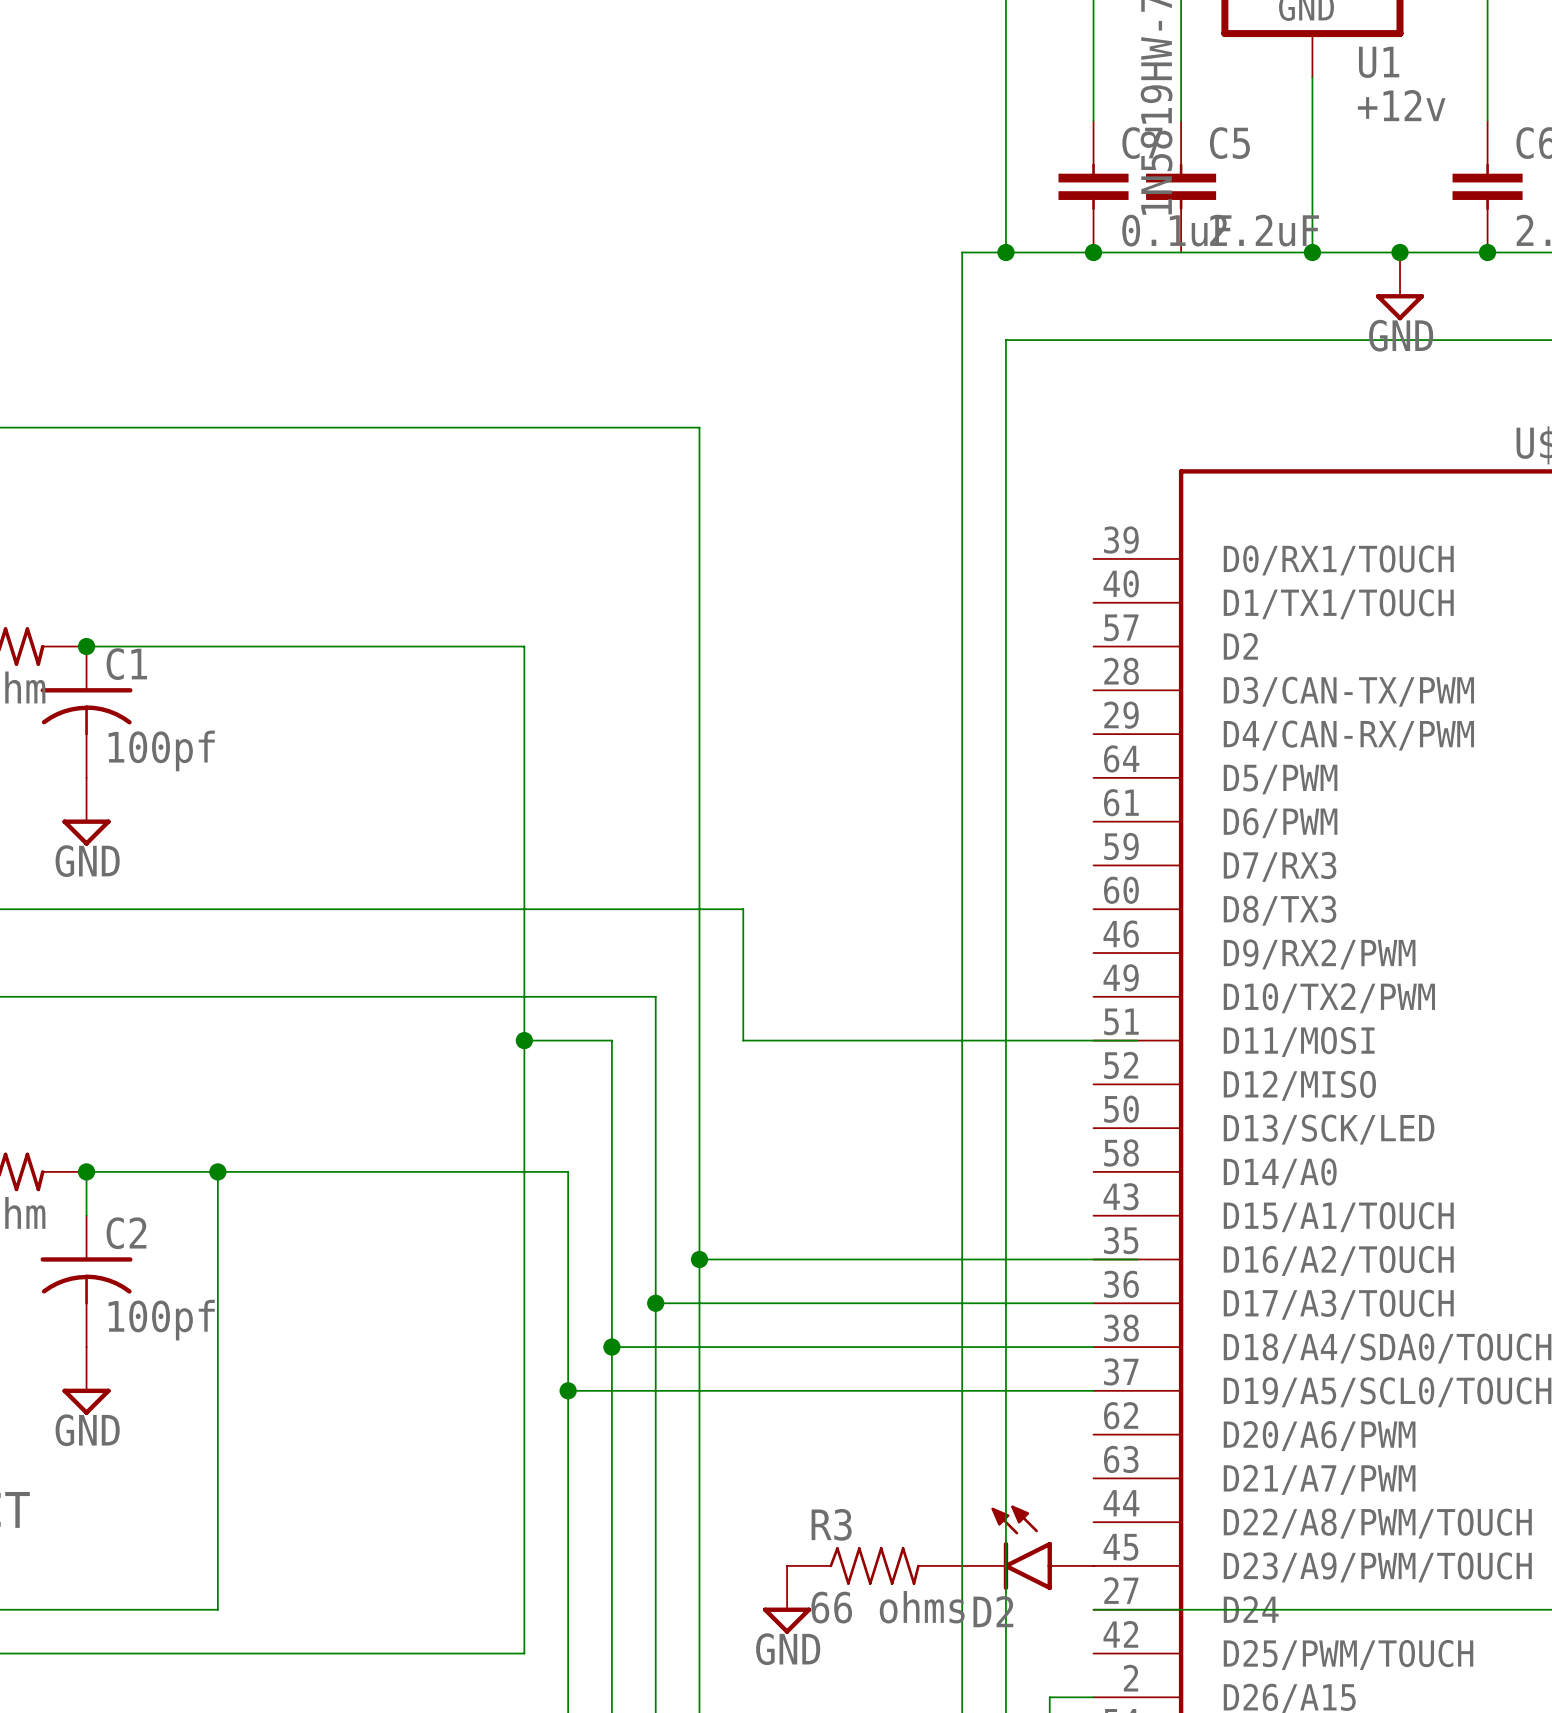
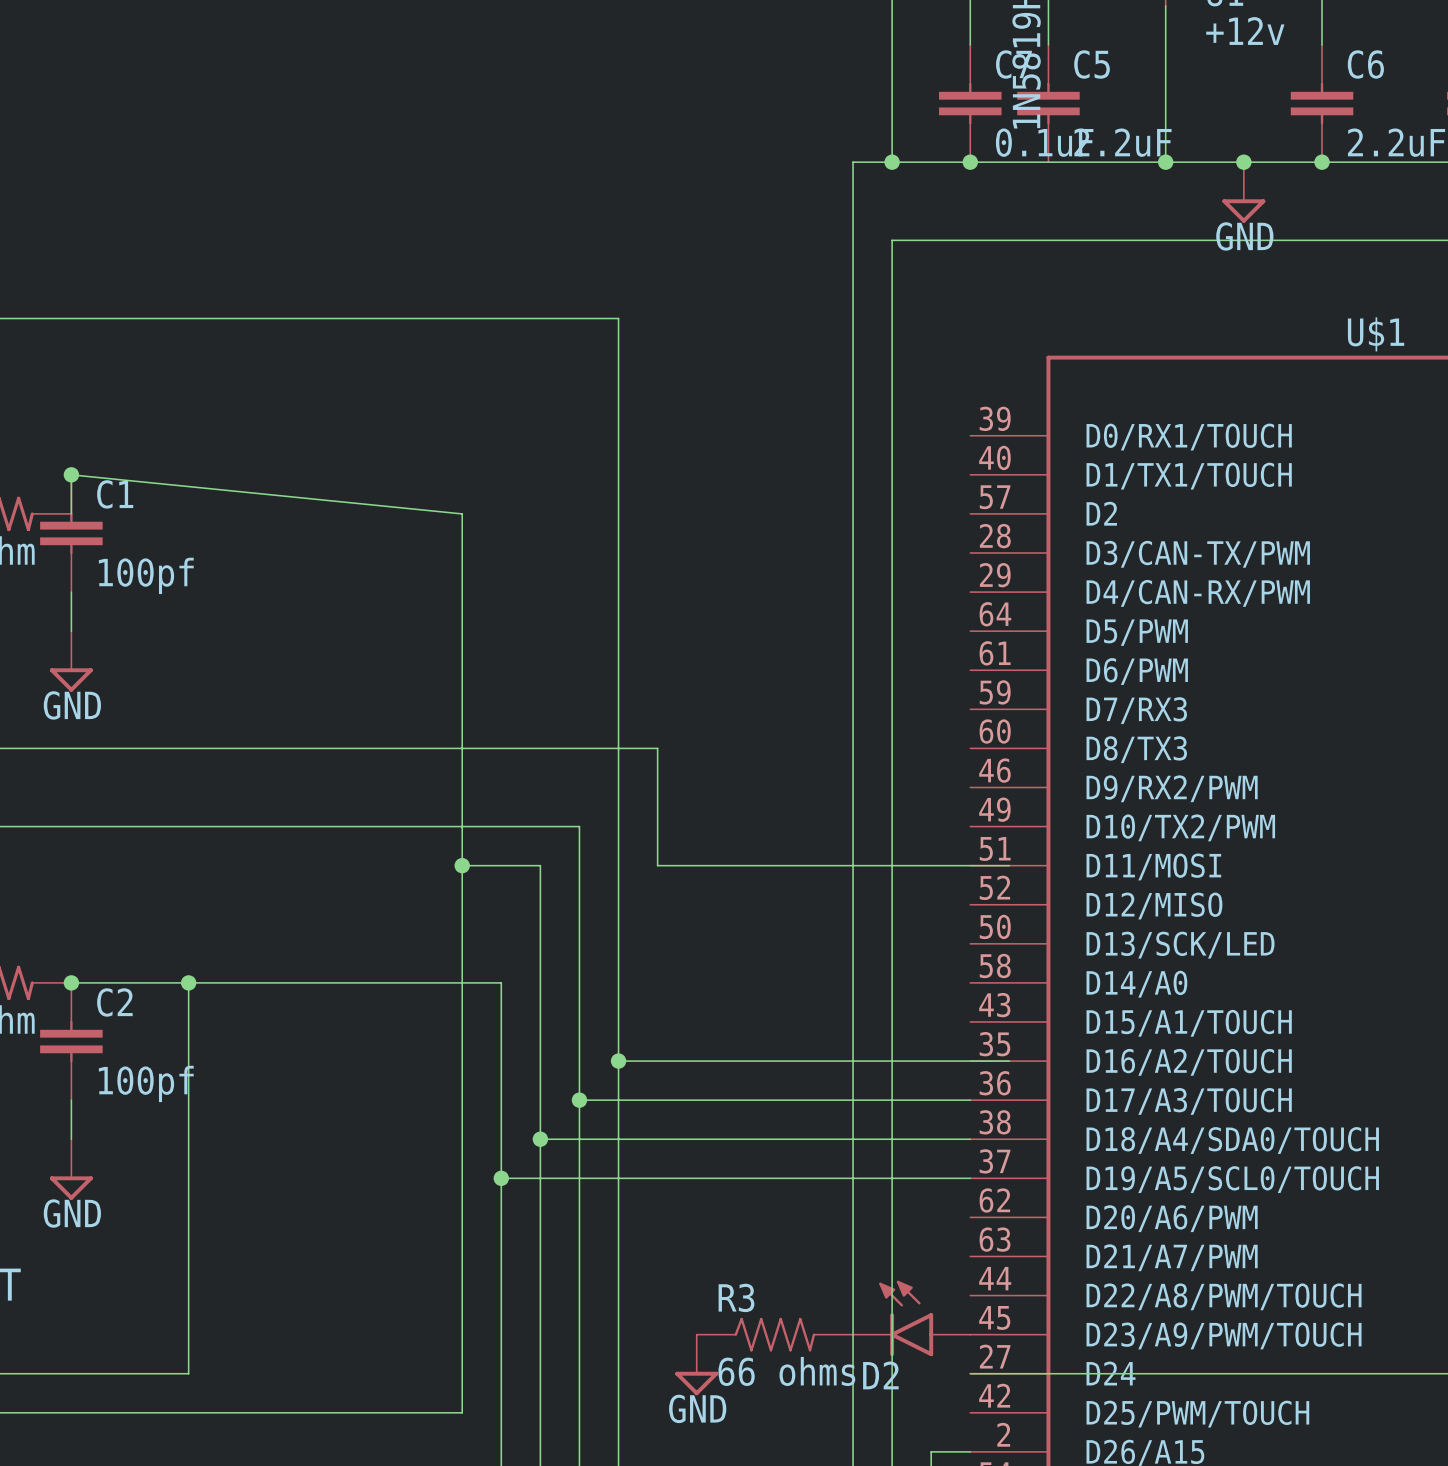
C1 symbol: [40, 646, 133, 778] -> [40, 474, 103, 593]
wire: (86, 646) (524, 646) -> (71, 513) (71, 474) (462, 513)
junction position: (86, 646) -> (71, 474)
C2 symbol: [40, 1215, 133, 1348] -> [40, 982, 103, 1101]

